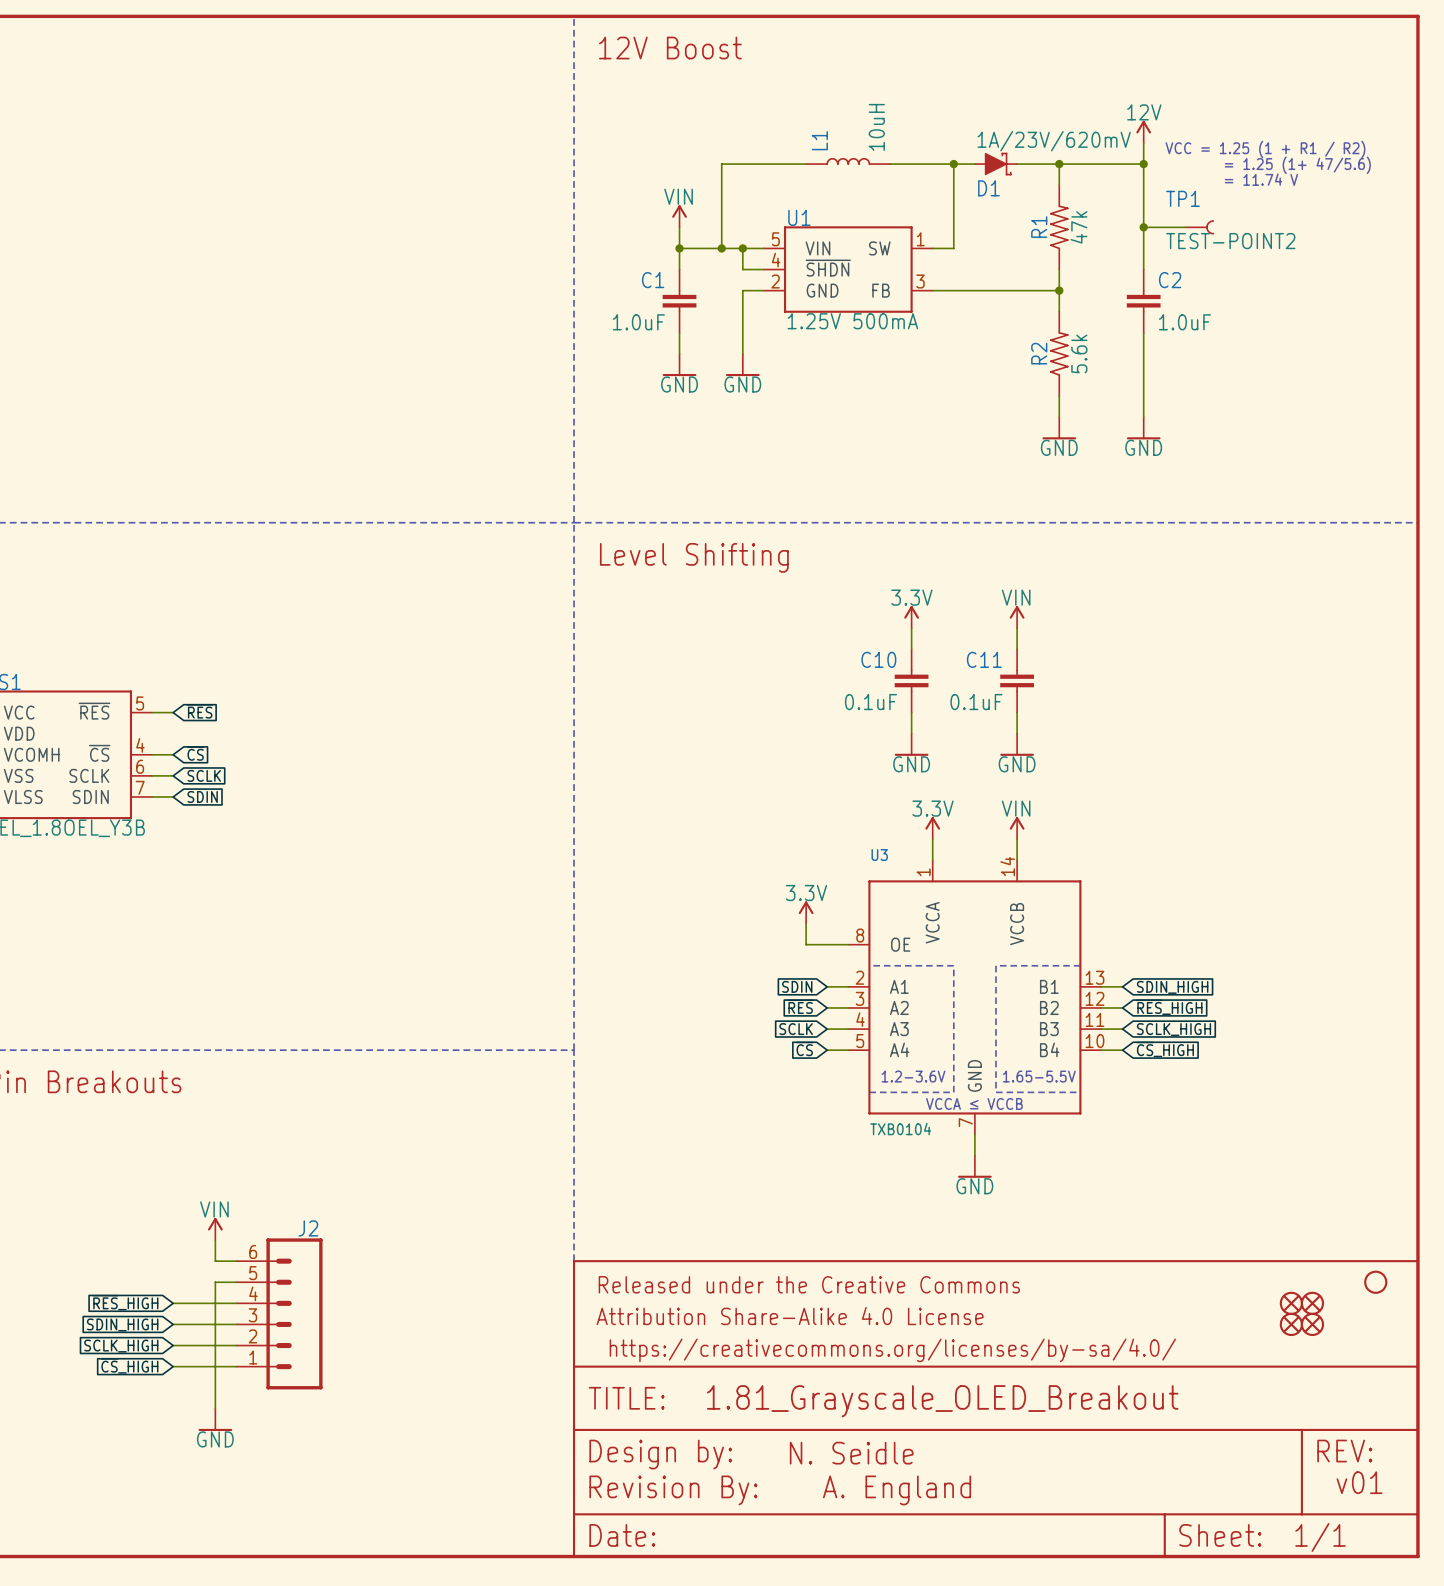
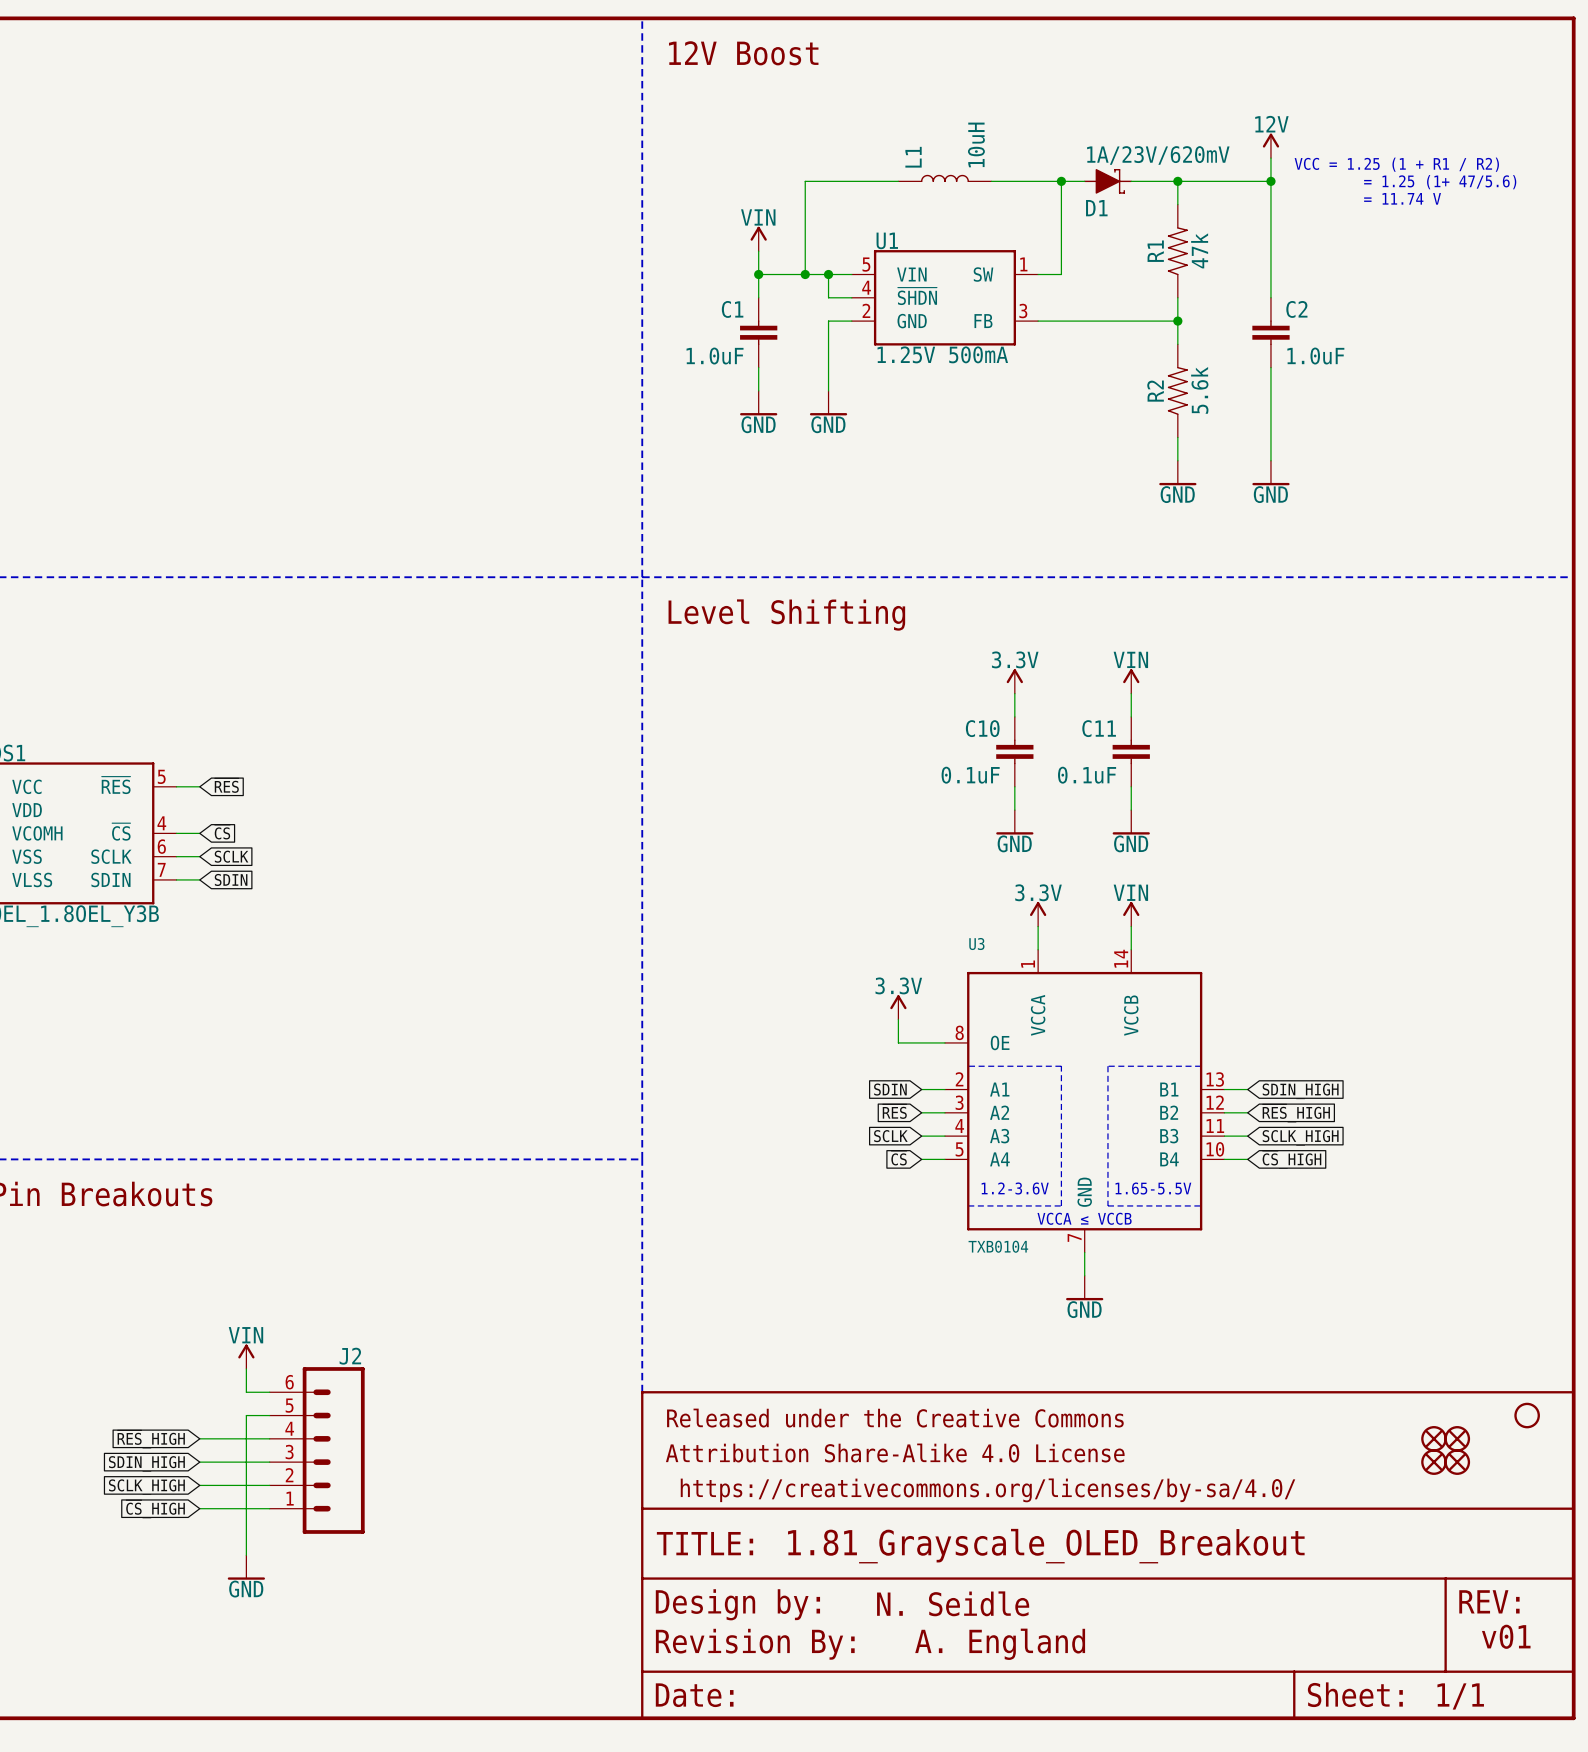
wire: (1143, 227) (1185, 227) -> none
junction: (1143, 227) -> none
TP1: TEST-POINT2 (1199, 227) -> none

